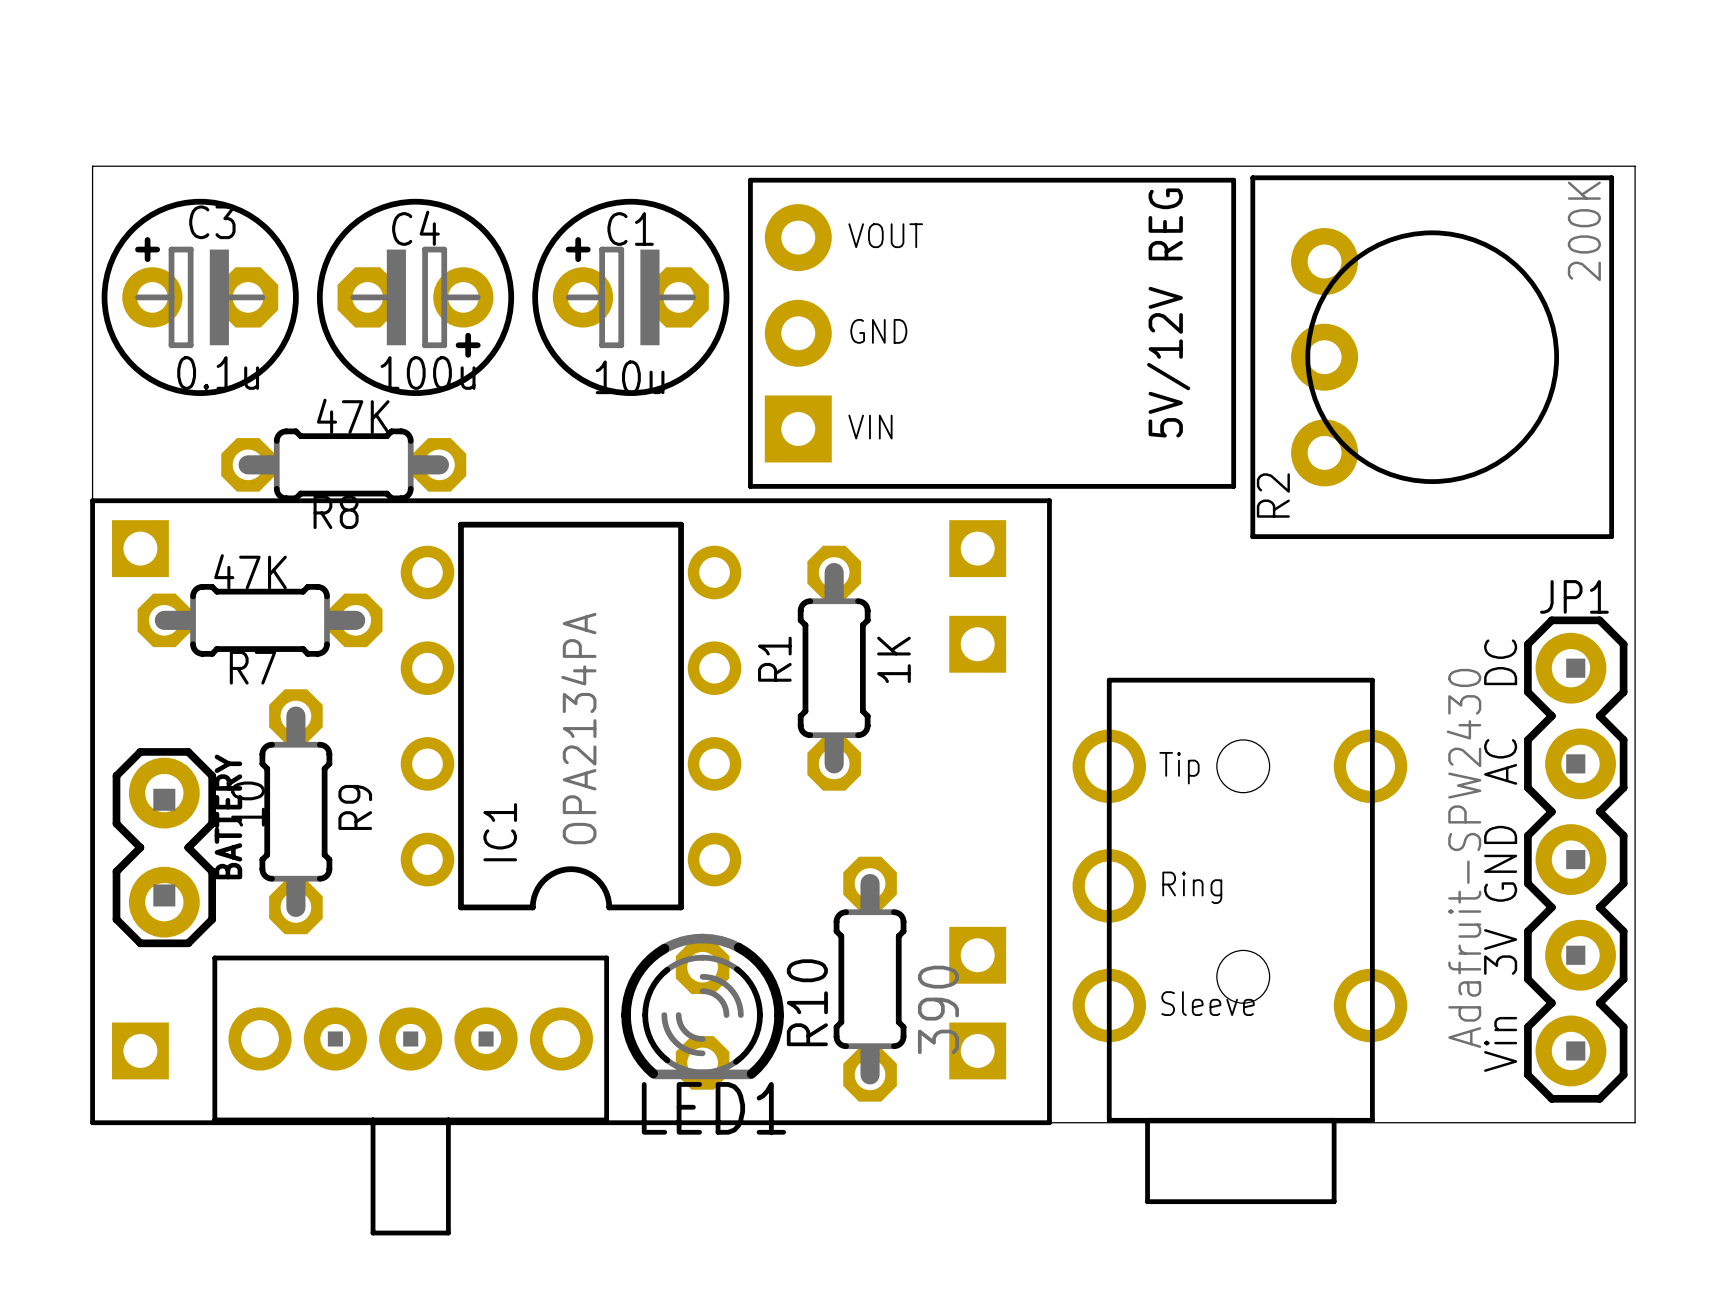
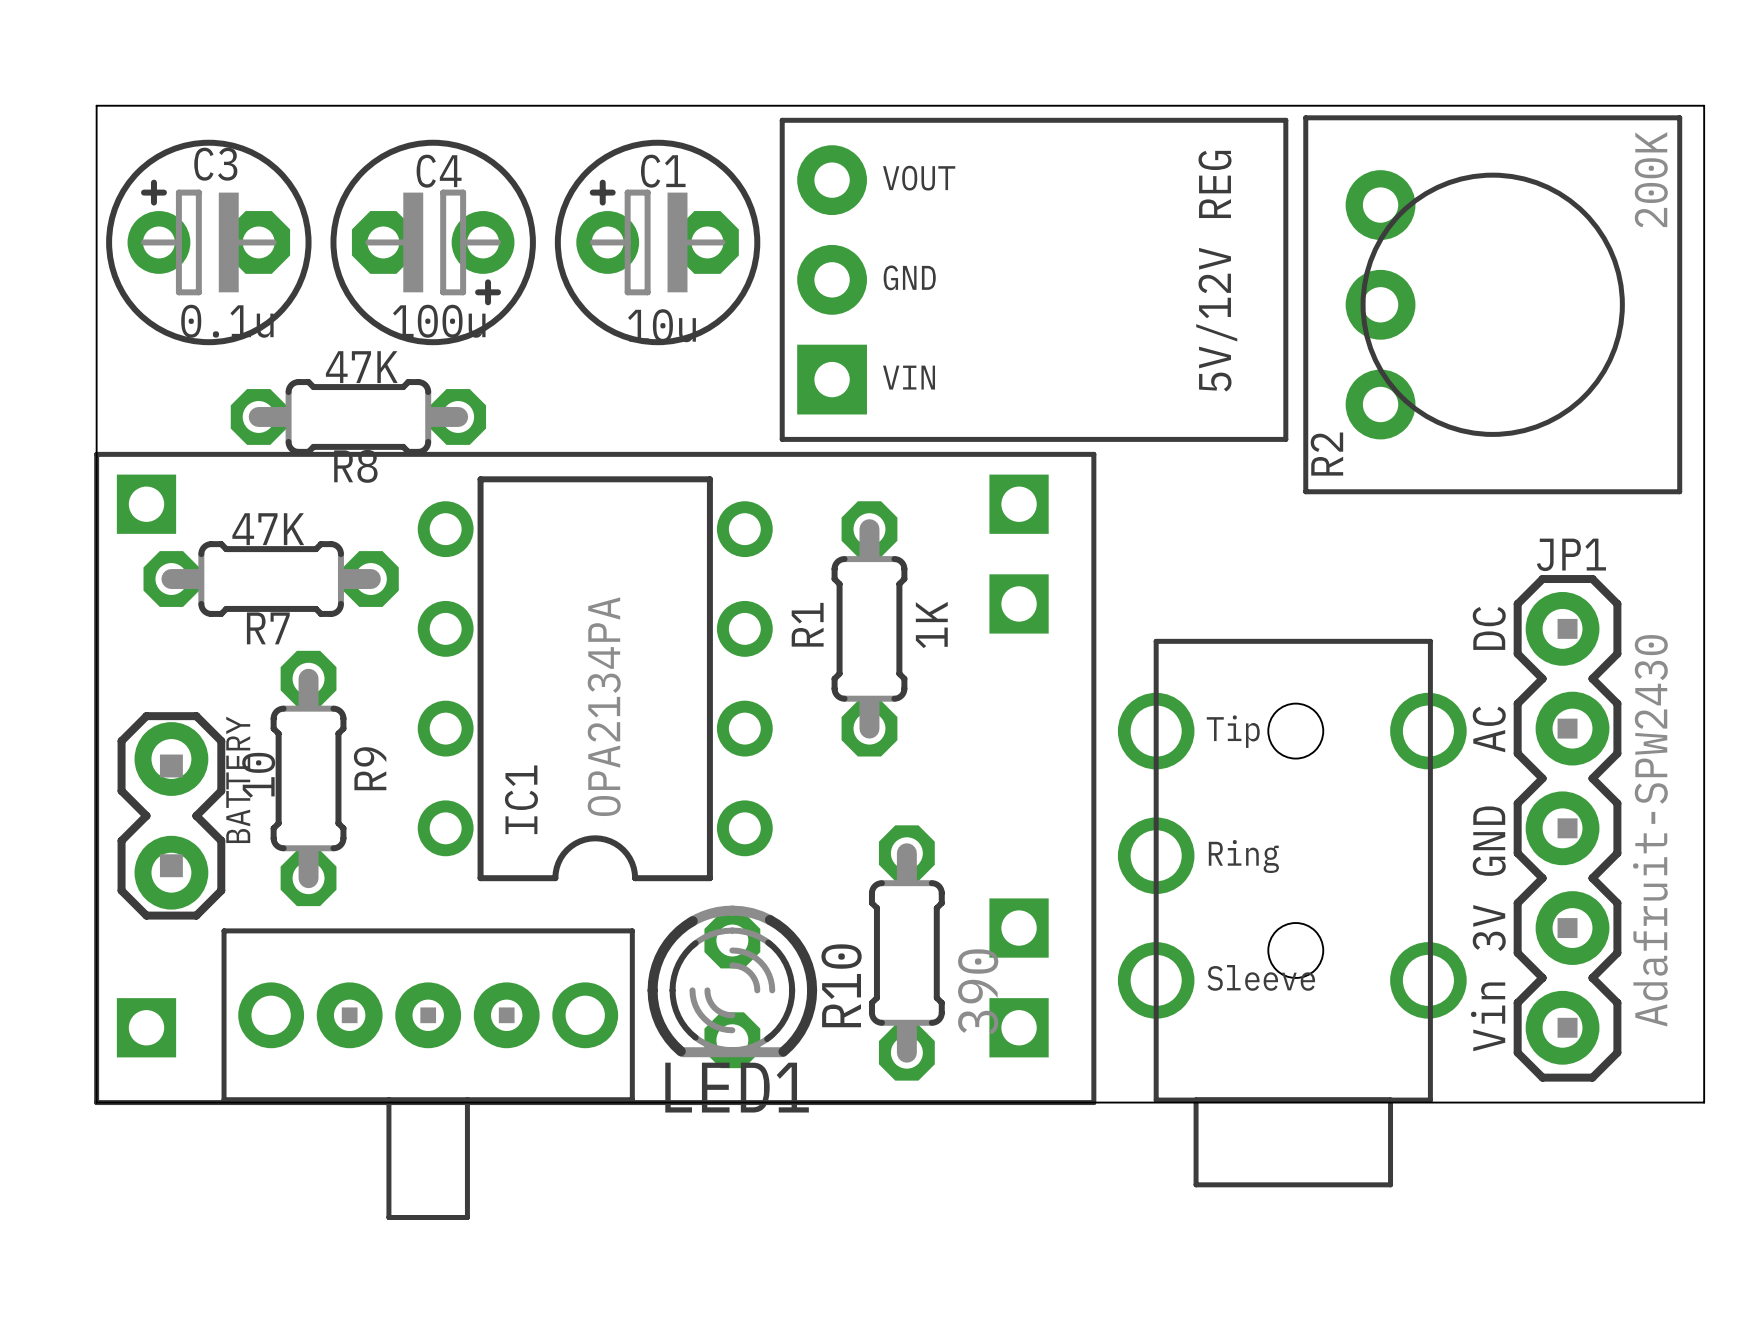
JP1 value position: Adafruit-SPW2430 (1464, 858) -> Adafruit-SPW2430 (1650, 830)
JP1 position: (1575, 859) -> (1567, 828)

